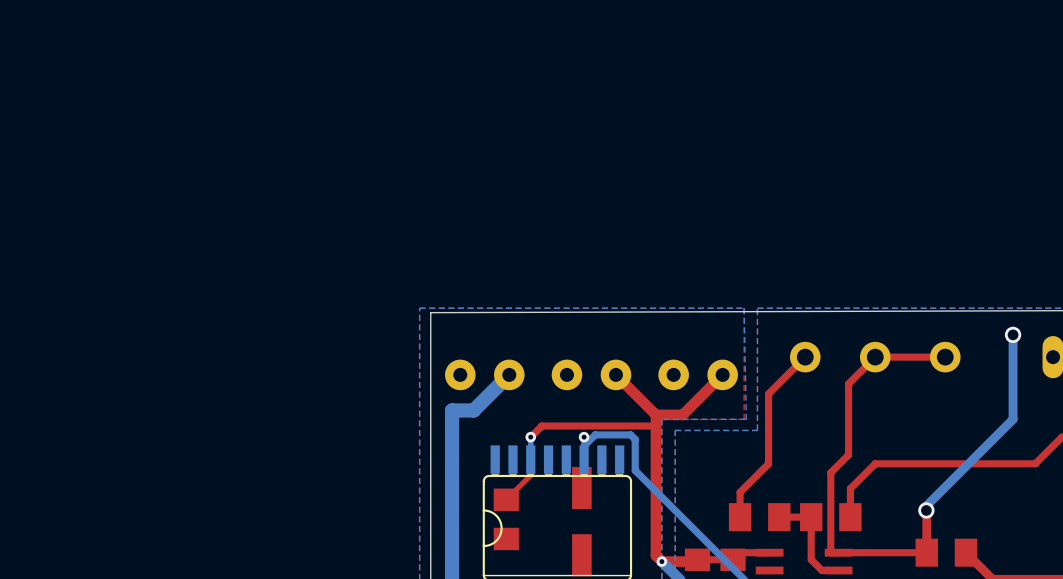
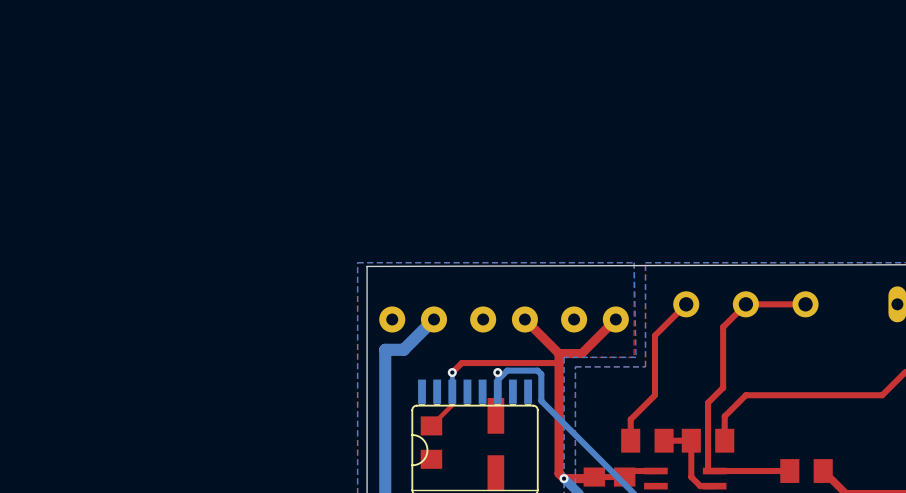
bottom track: (1013, 334) (1013, 419) (924, 508) (926, 510) -> none
via: (1013, 334) -> none
top track: (926, 510) (926, 552) -> none
via: (926, 510) -> none

